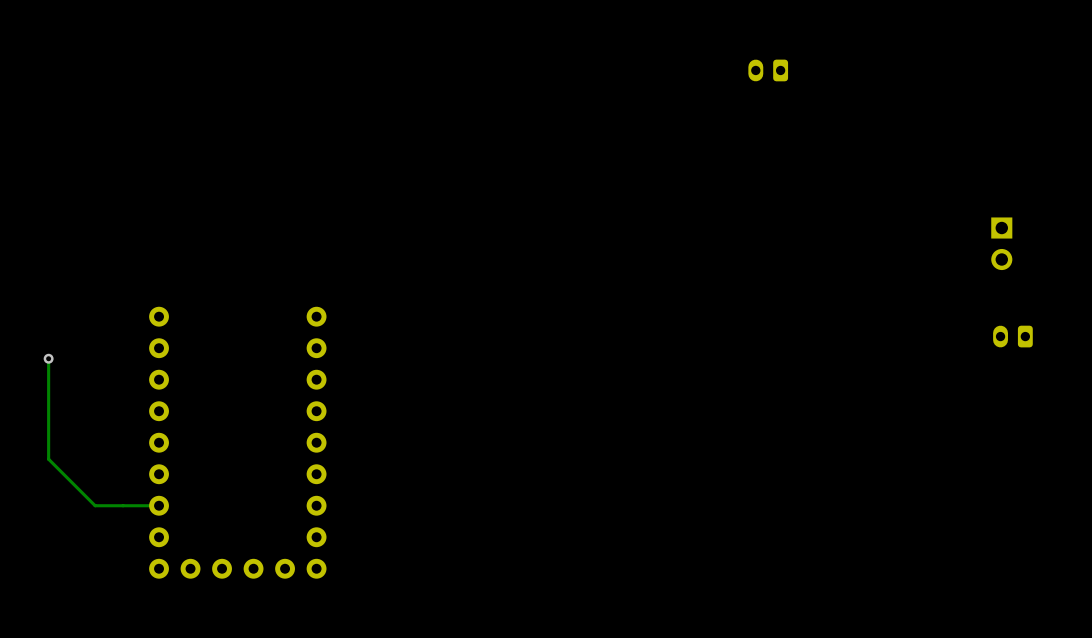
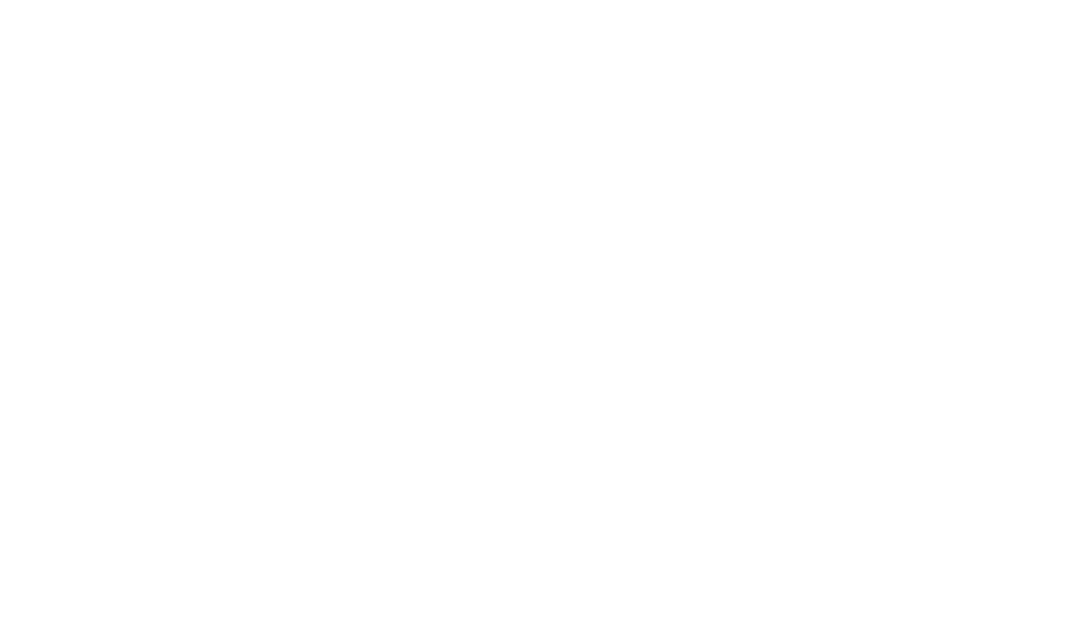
part: (768, 70) -> none
part: (1001, 243) -> none
part: (1012, 336) -> none
track: (48, 358) (48, 459) (95, 505) (159, 505) -> none
via: (48, 358) -> none
part: (237, 442) -> none

